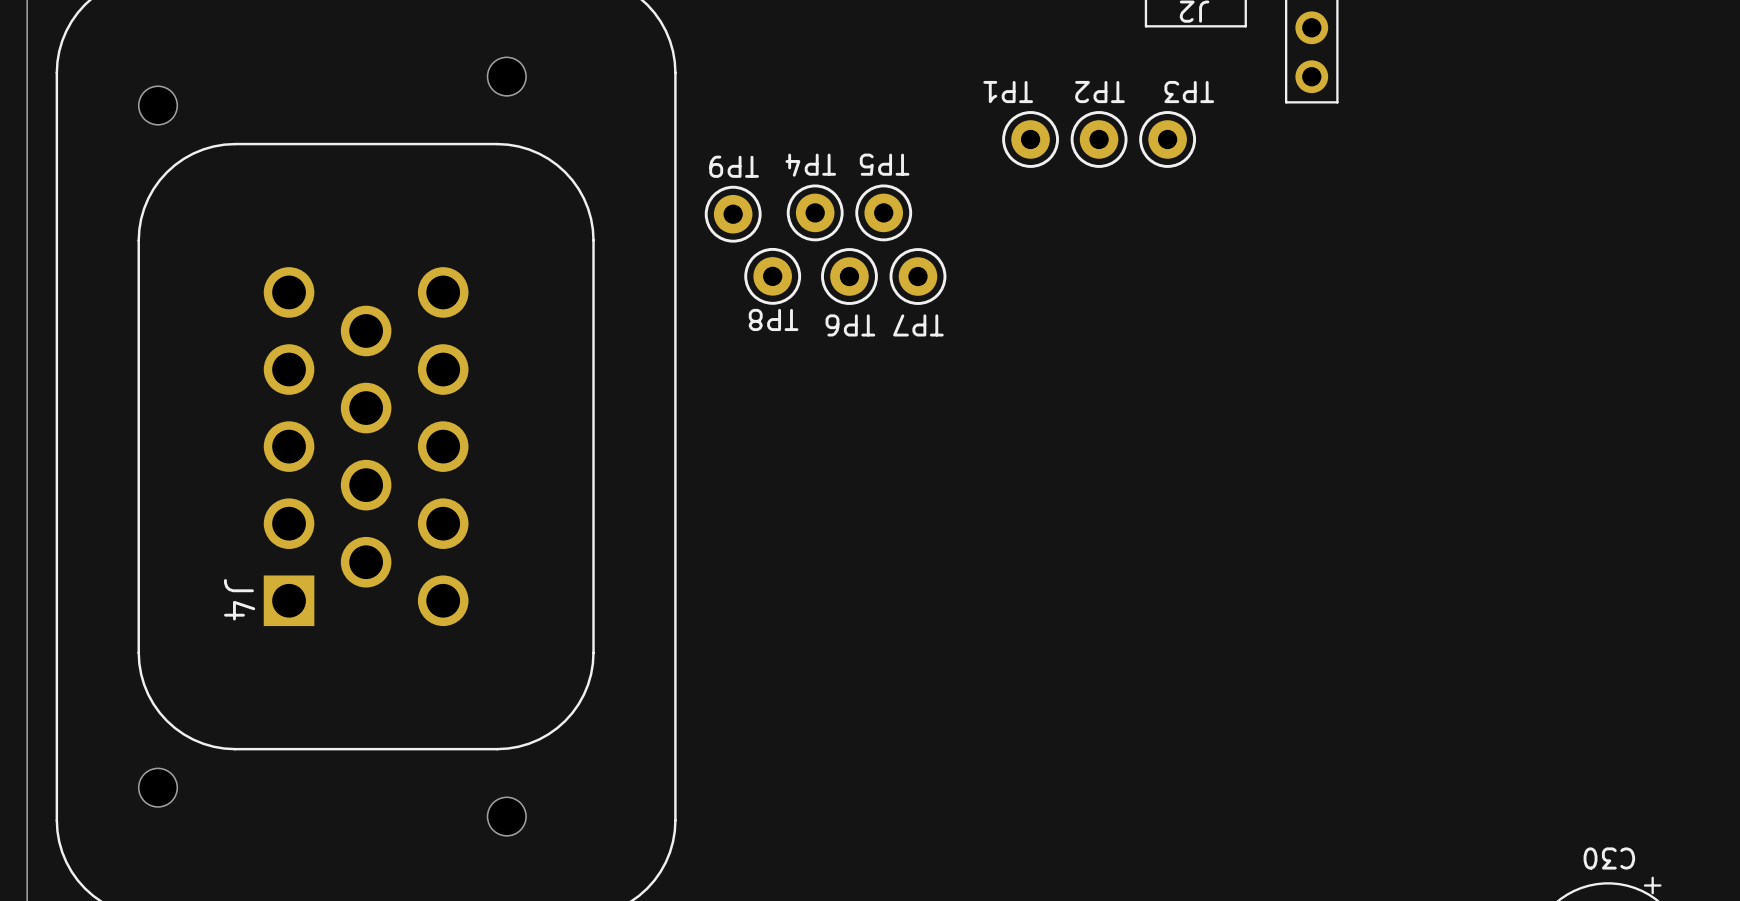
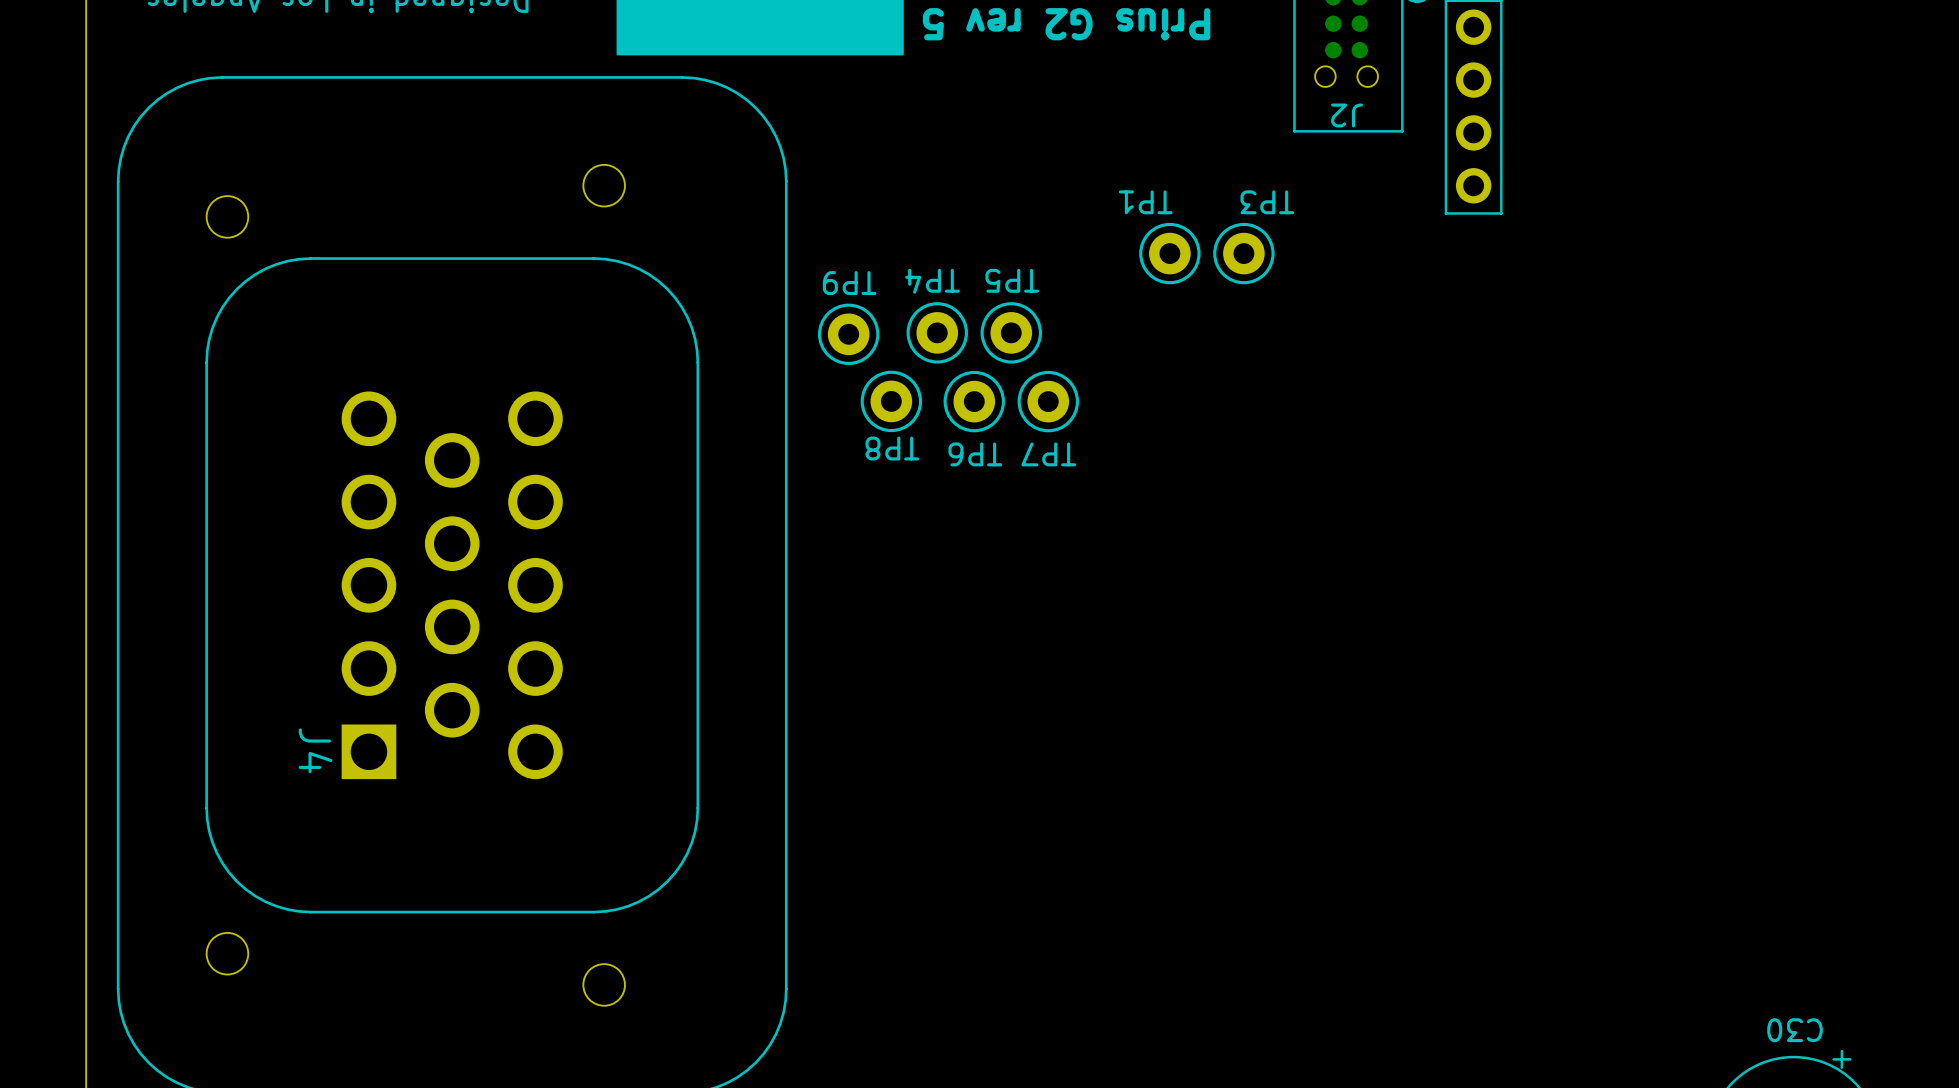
TP2 name: TP2 (1100, 92) -> TP3 (1267, 202)
TP3: (1167, 139) -> none

